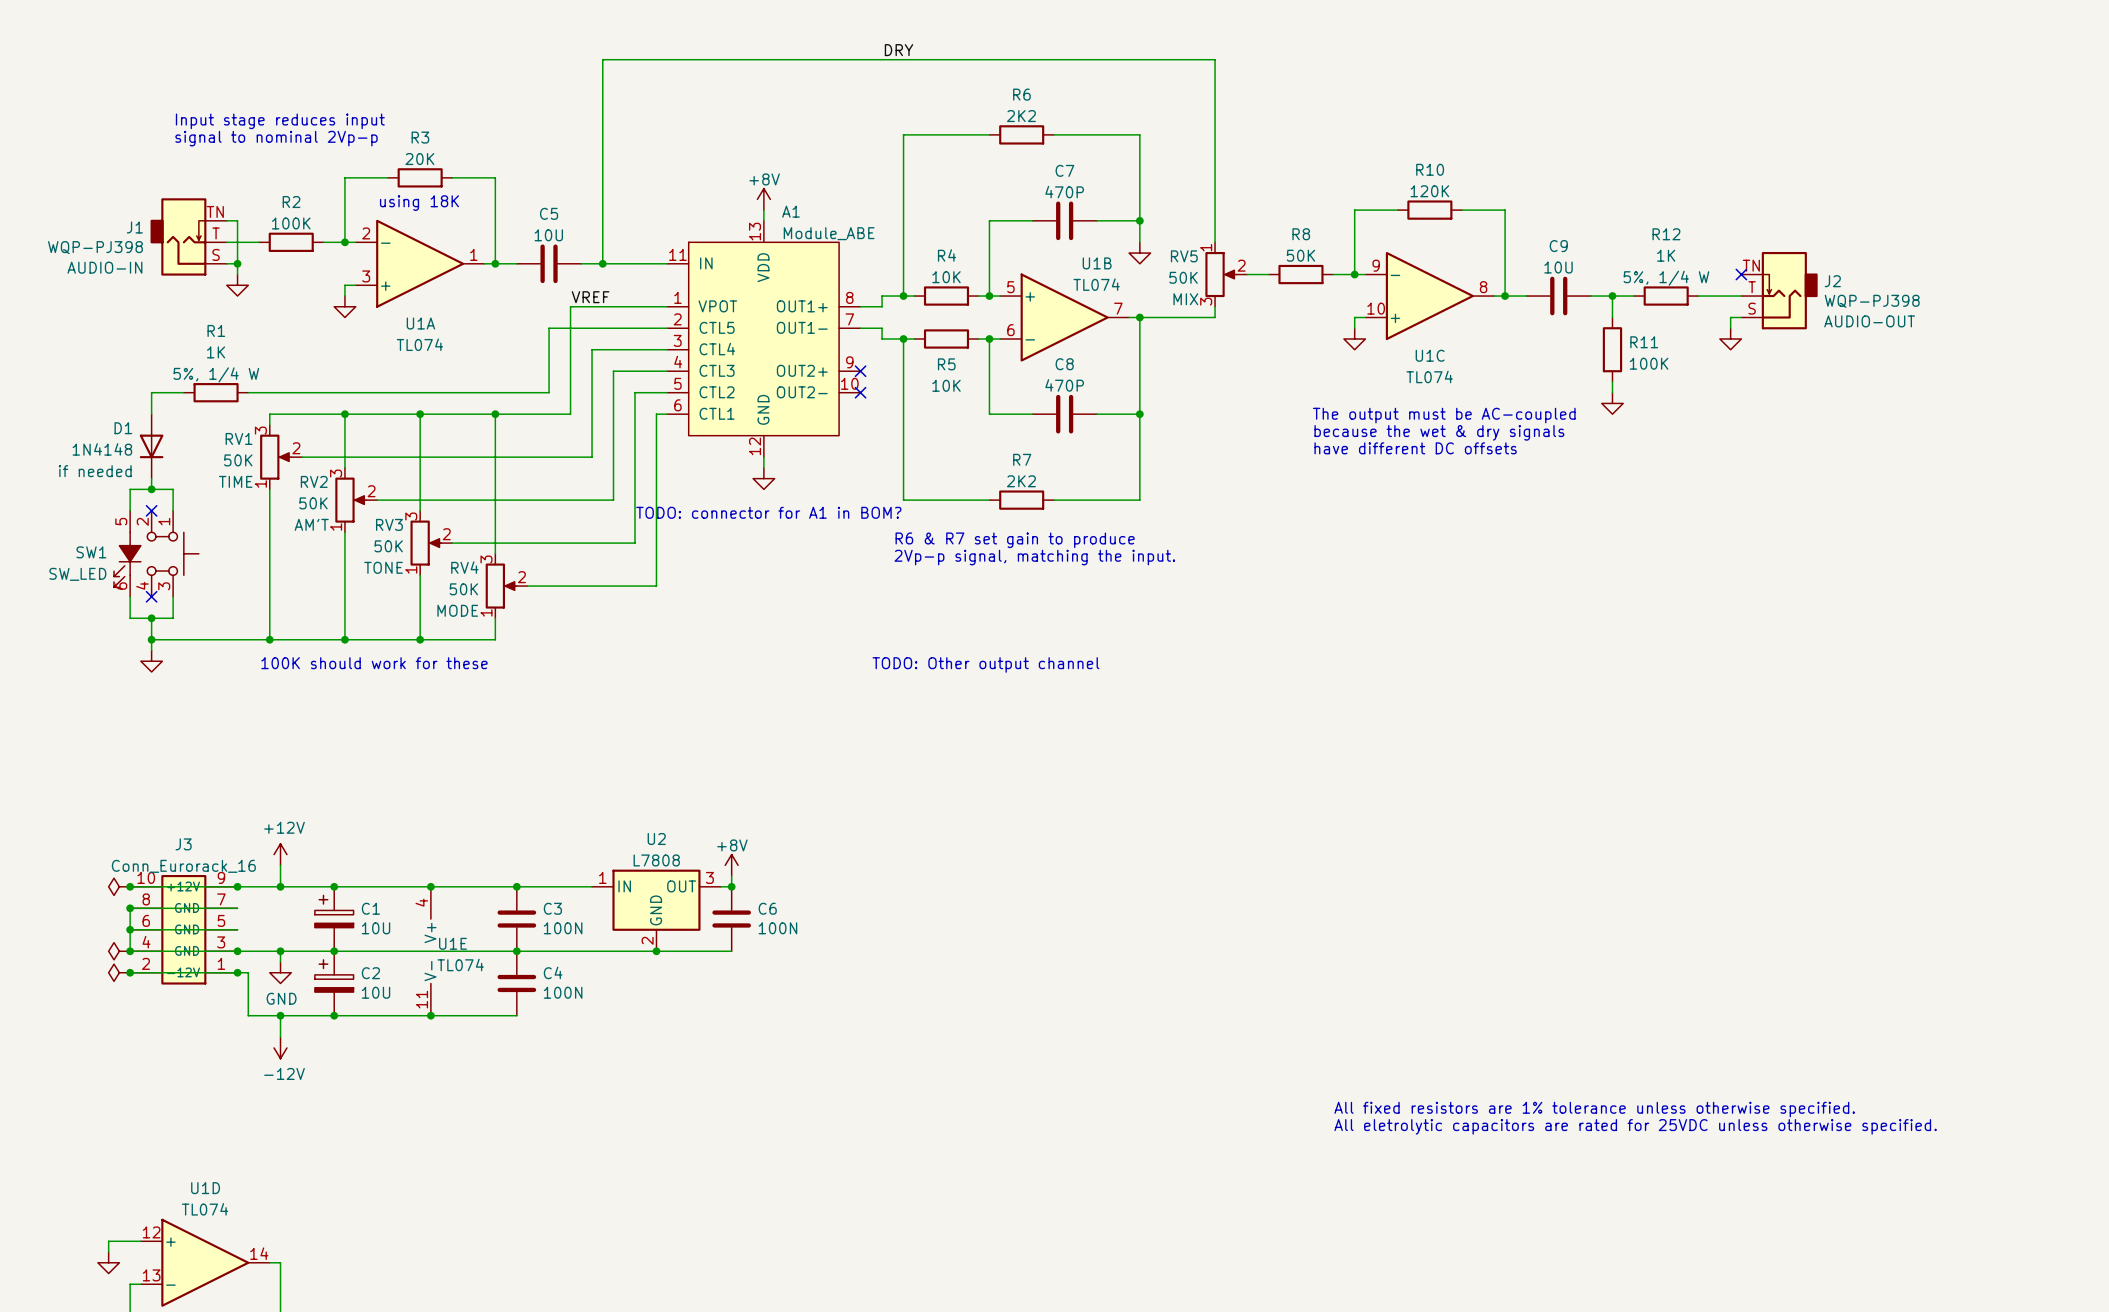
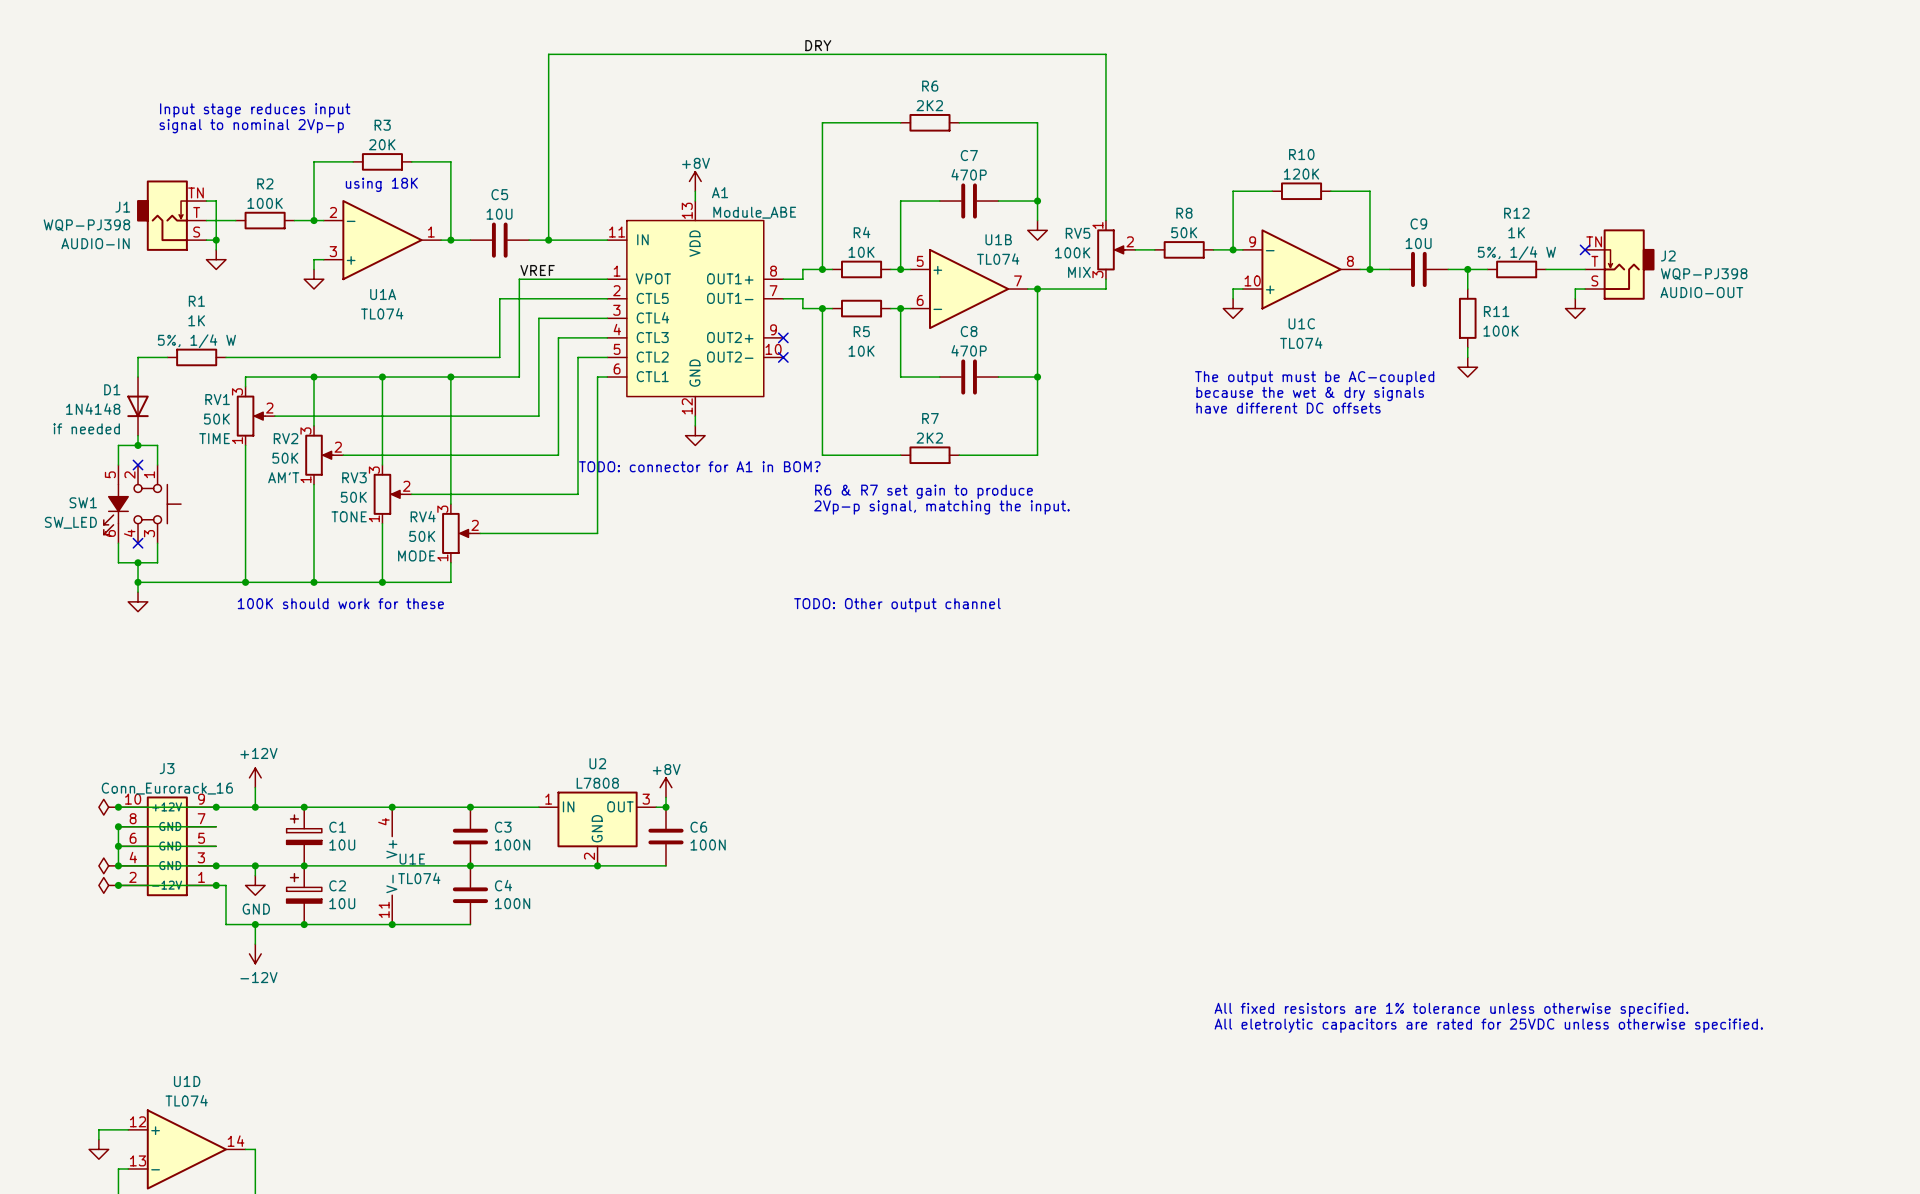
RV5 value: 50K (1183, 277) -> 100K (1072, 252)

